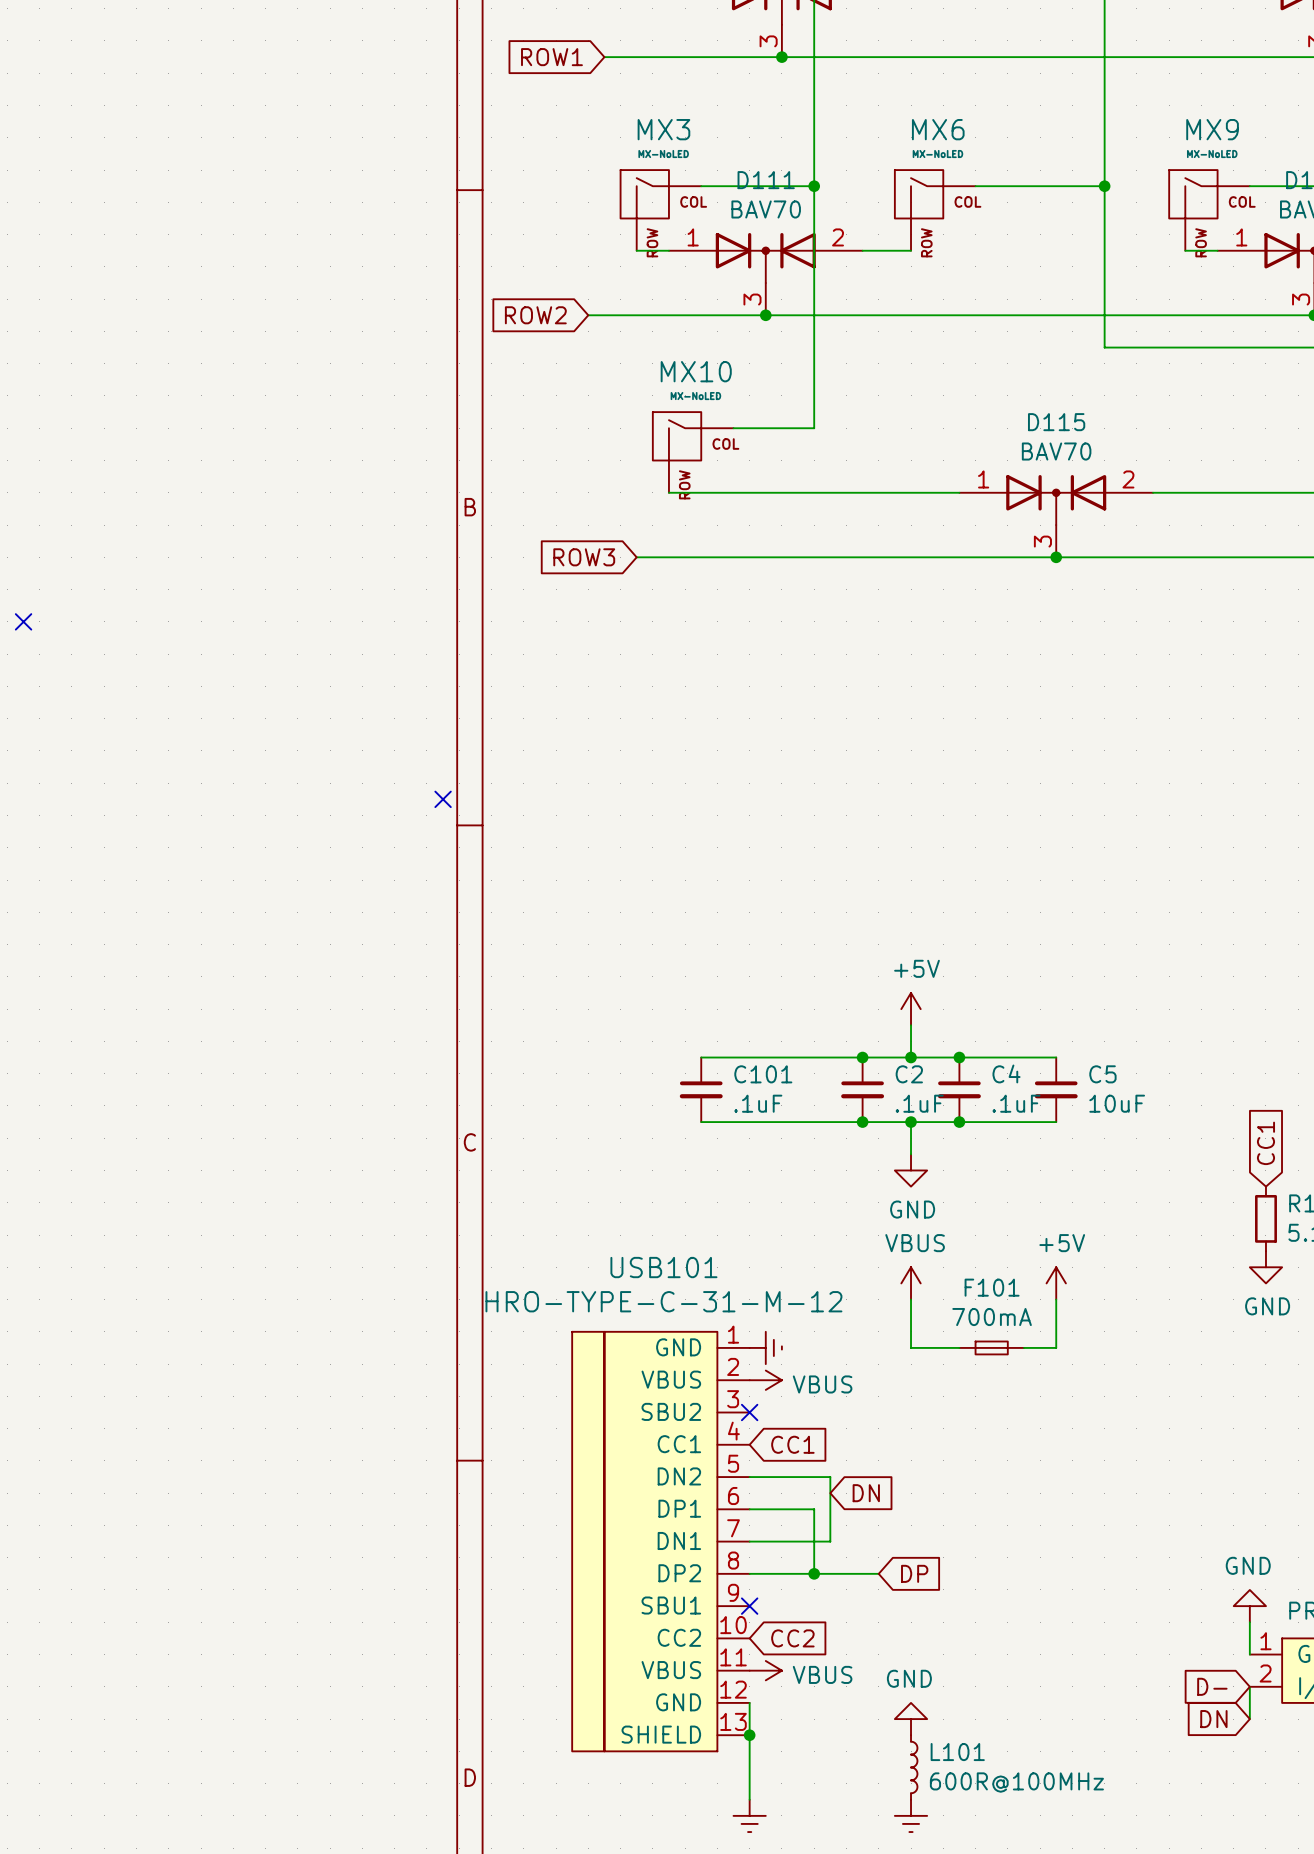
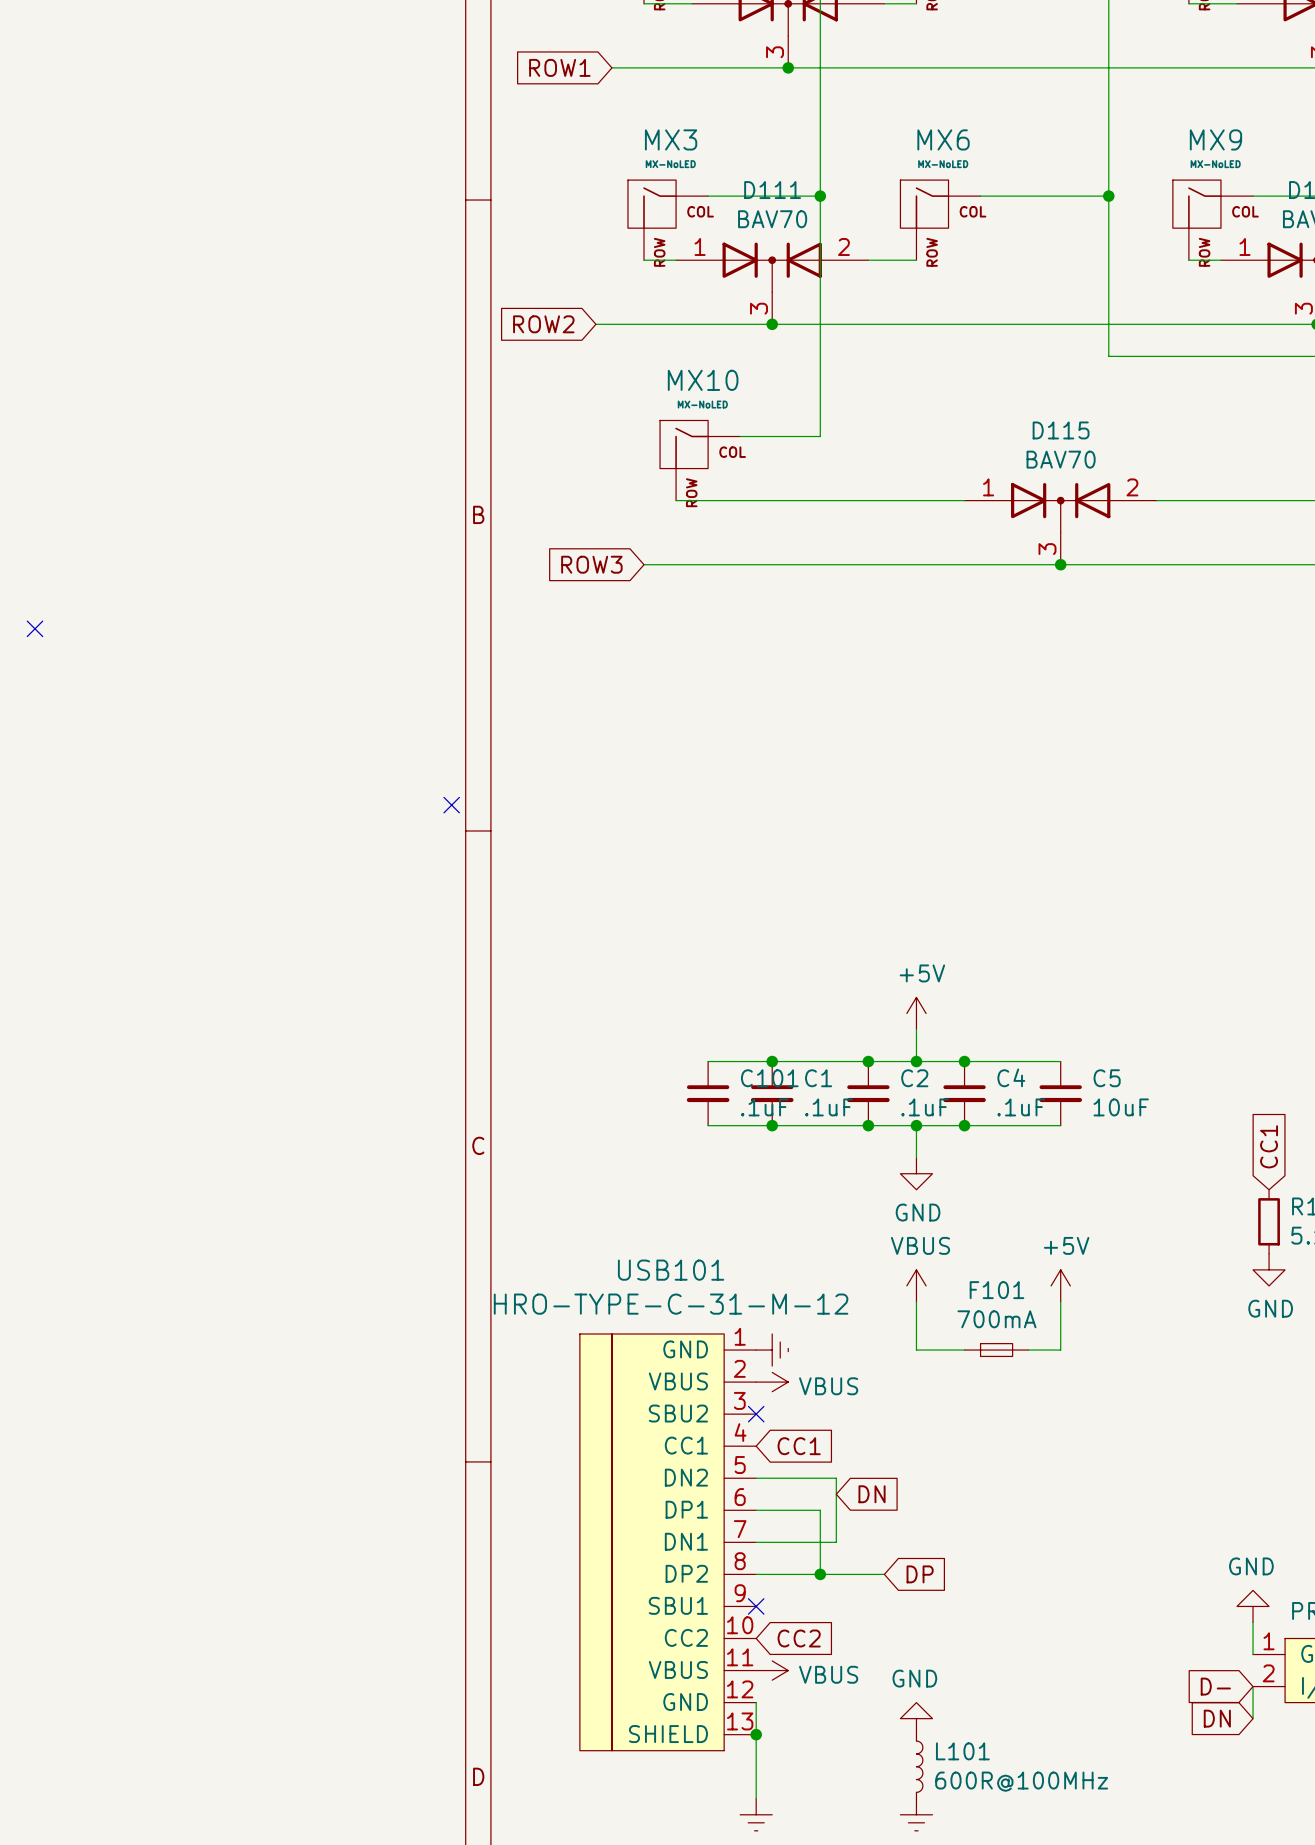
junction: none -> (772, 1061)
C1: none -> .1uF (772, 1093)
junction: none -> (772, 1125)

